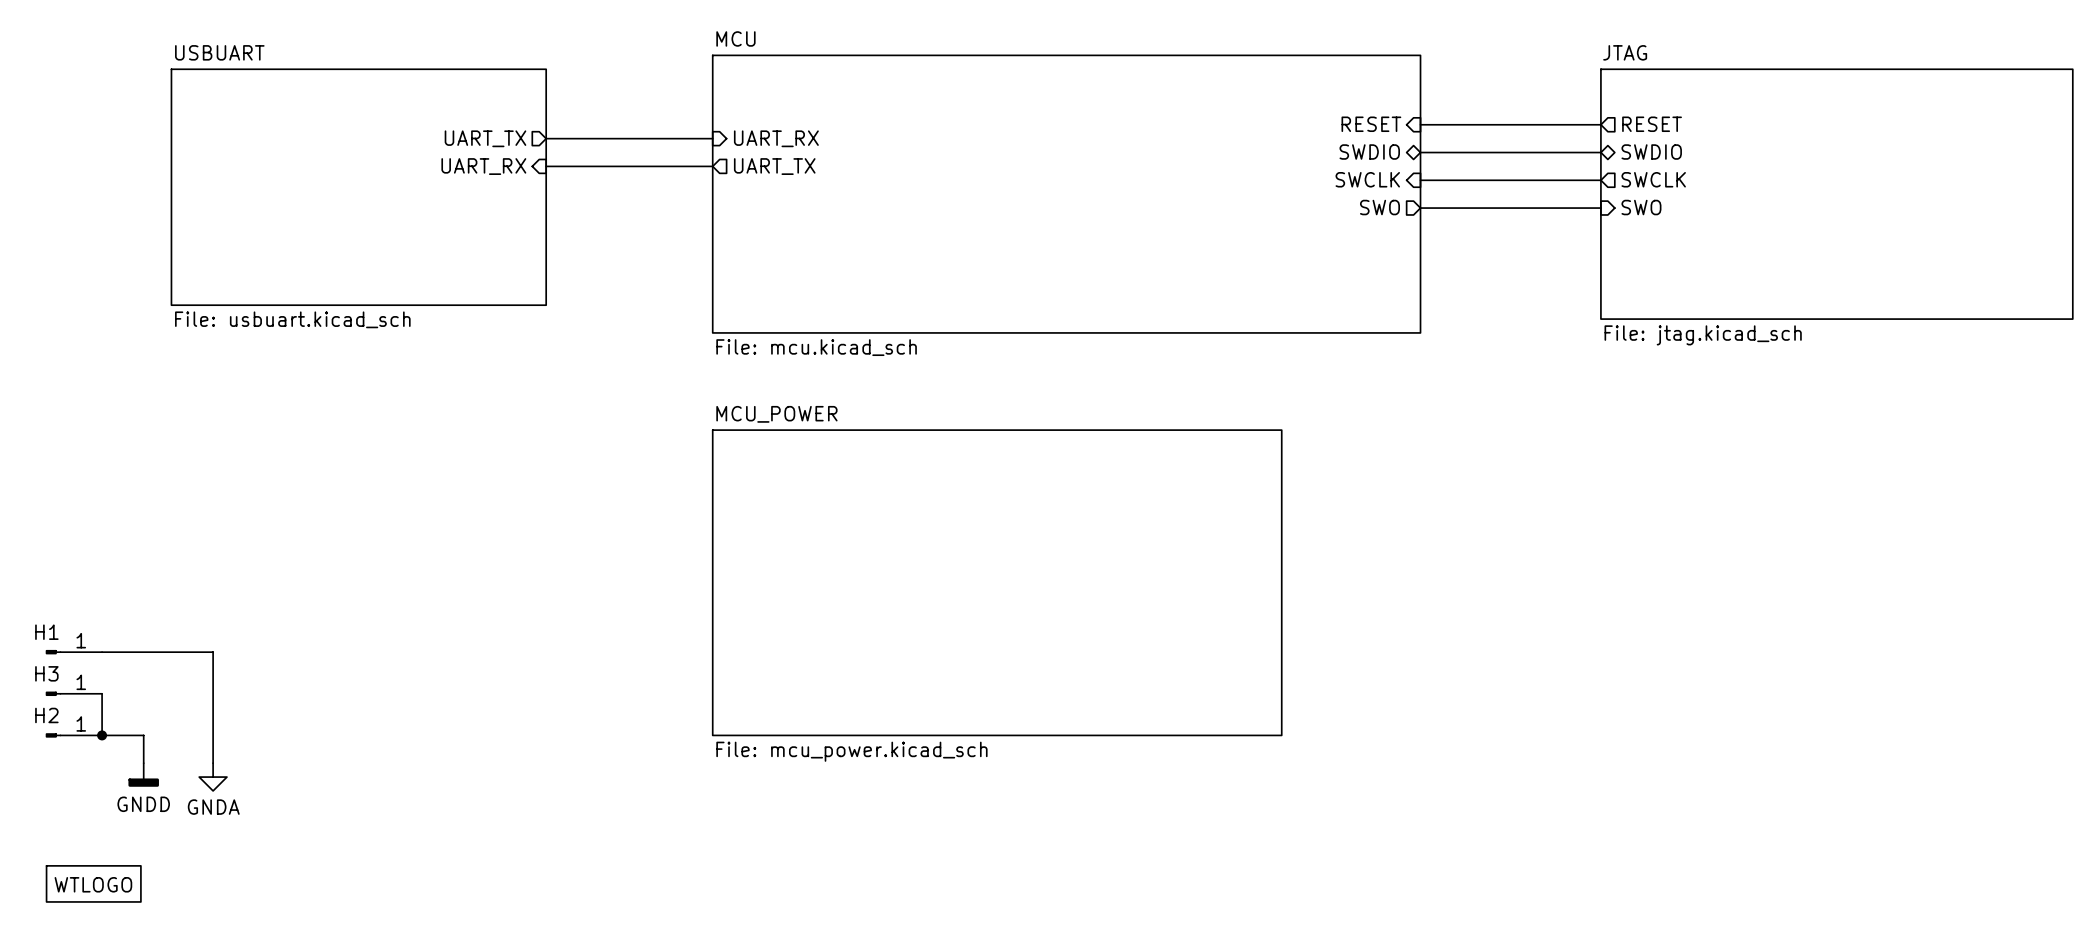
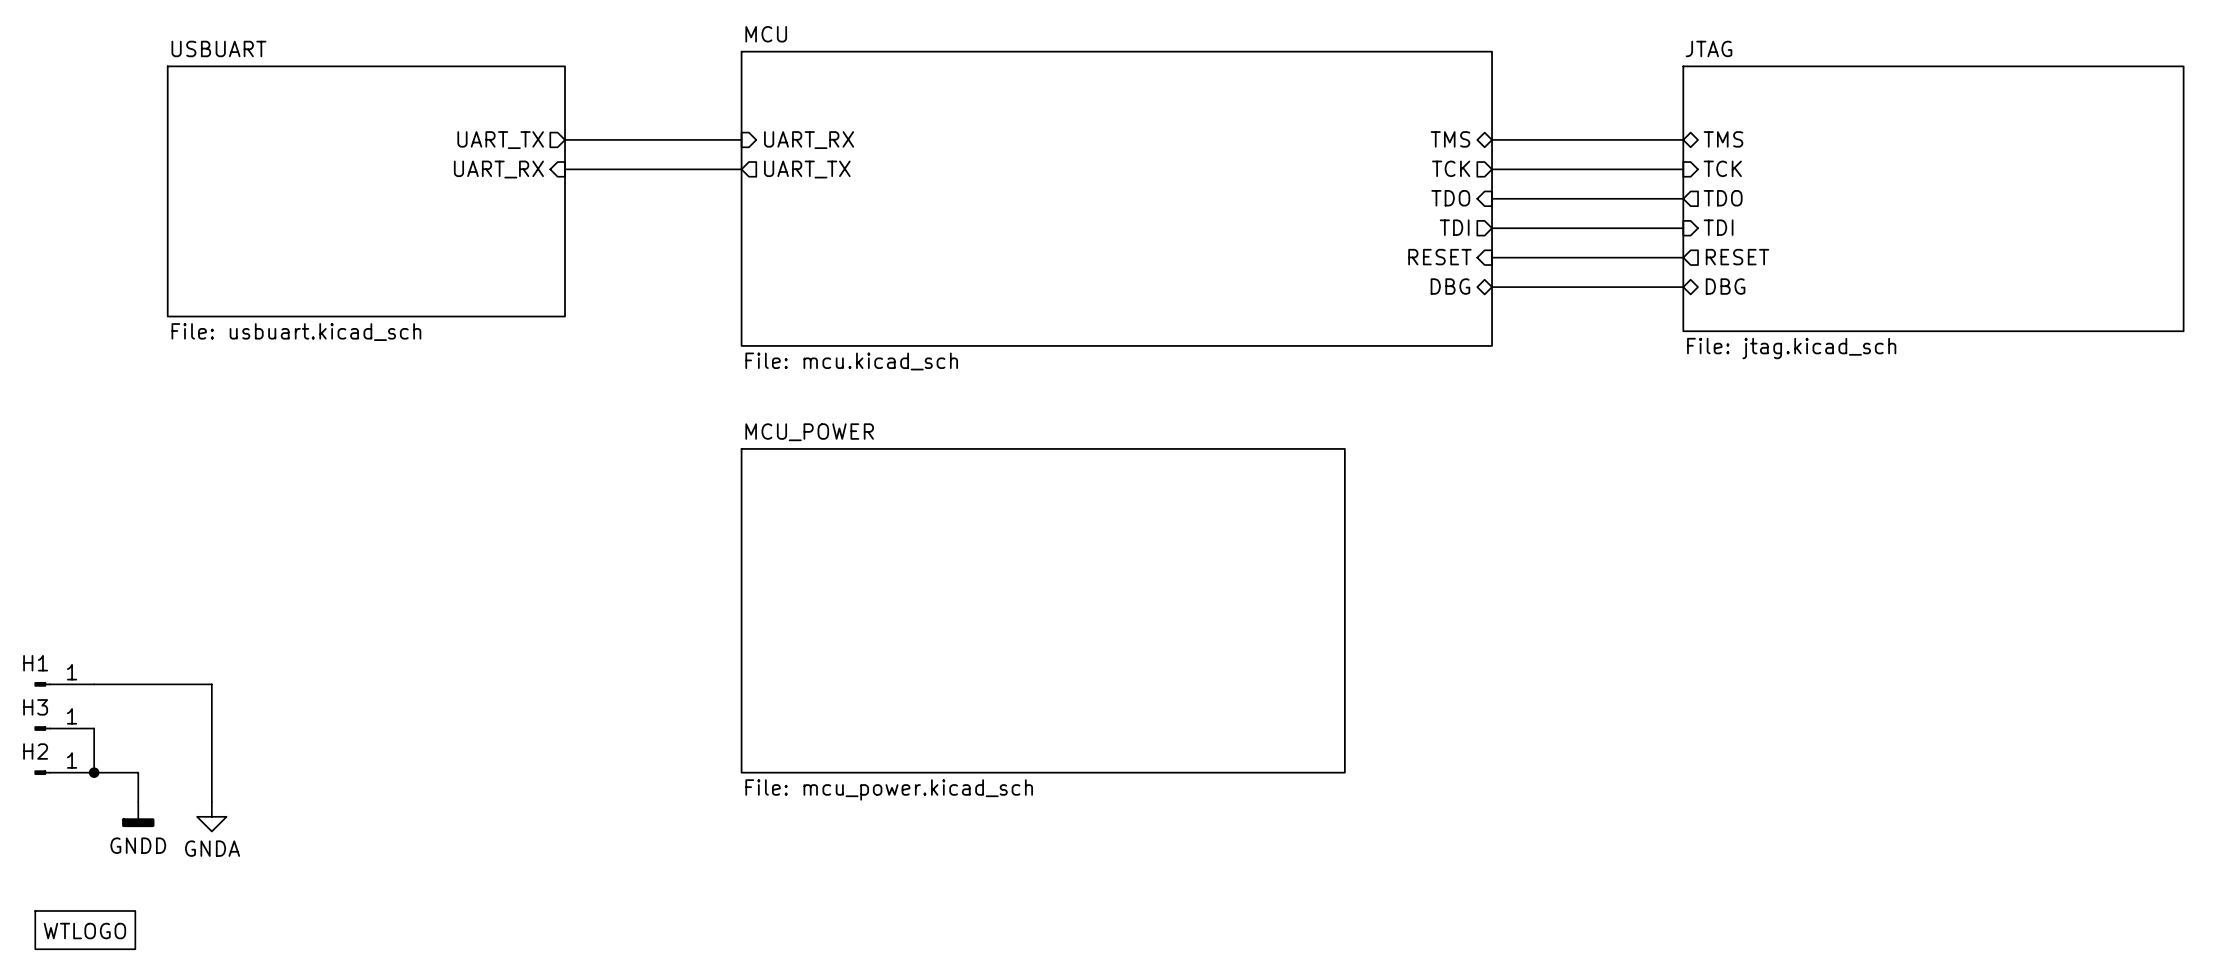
sheet pin: RESET (1371, 124) -> none
wire: (1420, 124) (1600, 124) -> (1492, 139) (1683, 139)
sheet pin: RESET (1652, 124) -> none
sheet pin: none -> TMS (1450, 139)
sheet pin: none -> TMS (1723, 139)
sheet pin: SWDIO (1369, 152) -> none
wire: (1420, 152) (1600, 152) -> (1492, 169) (1683, 169)
sheet pin: SWDIO (1651, 152) -> none
sheet pin: none -> TCK (1451, 168)
sheet pin: none -> TCK (1722, 168)
sheet pin: SWCLK (1367, 179) -> none
sheet pin: SWCLK (1653, 179) -> none
wire: (1420, 180) (1600, 180) -> (1492, 198) (1683, 198)
sheet pin: none -> TDO (1450, 198)
sheet pin: none -> TDO (1723, 198)
sheet pin: SWO (1379, 207) -> none
sheet pin: SWO (1641, 207) -> none
wire: (1420, 208) (1600, 208) -> (1492, 228) (1683, 228)
sheet pin: none -> TDI (1454, 227)
sheet pin: none -> TDI (1718, 227)
sheet pin: none -> RESET (1439, 257)
wire: none -> (1492, 257) (1683, 257)
sheet pin: none -> RESET (1737, 257)
sheet pin: none -> DBG (1450, 286)
sheet pin: none -> DBG (1725, 286)
wire: none -> (1492, 287) (1683, 287)

